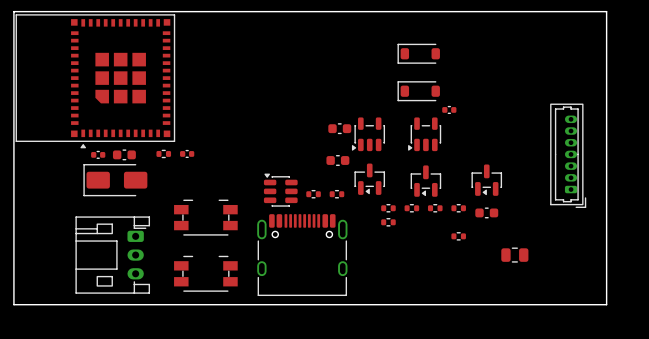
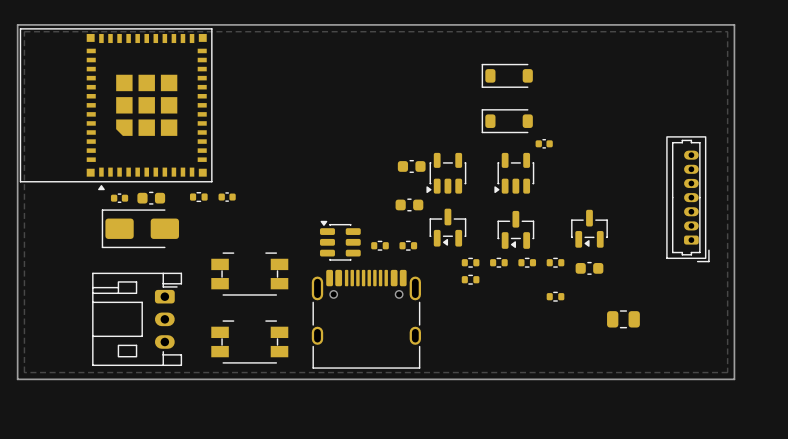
zone outline: none -> (24, 31) (727, 31) (727, 372) (24, 372) (24, 31)

